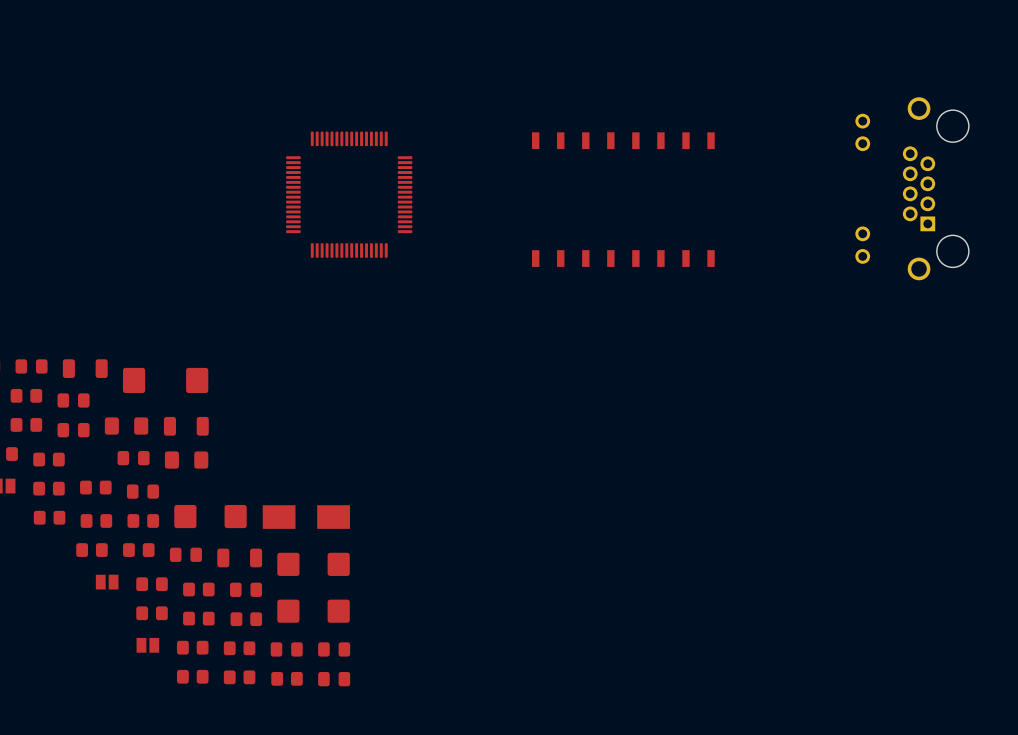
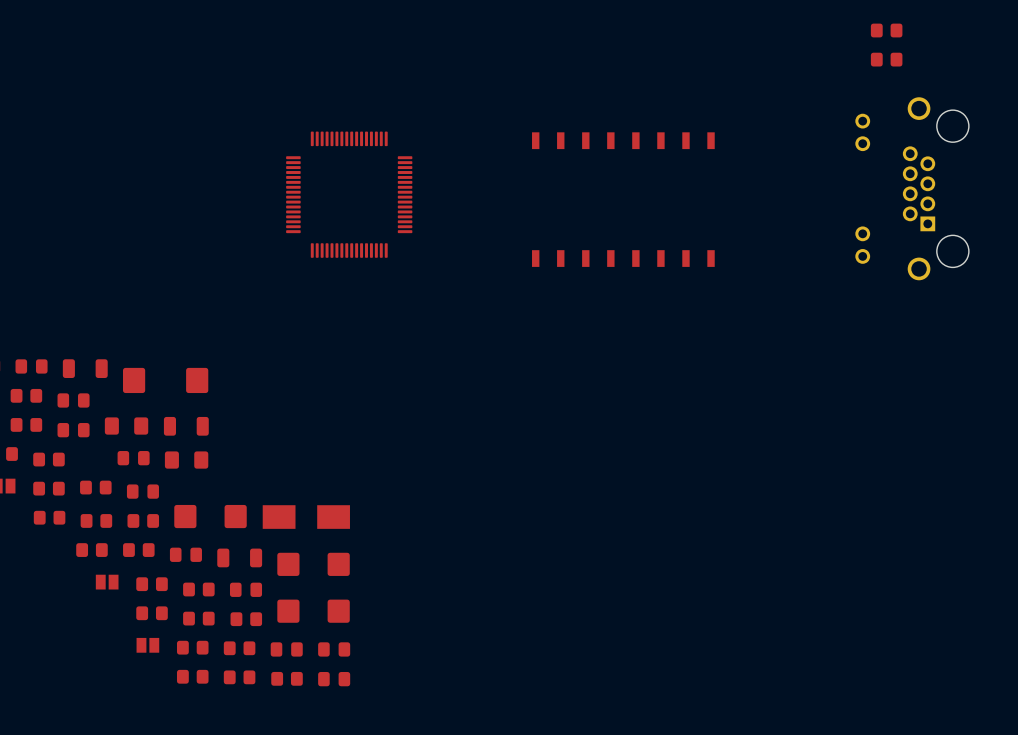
part: none -> (886, 30)
part: none -> (886, 59)

